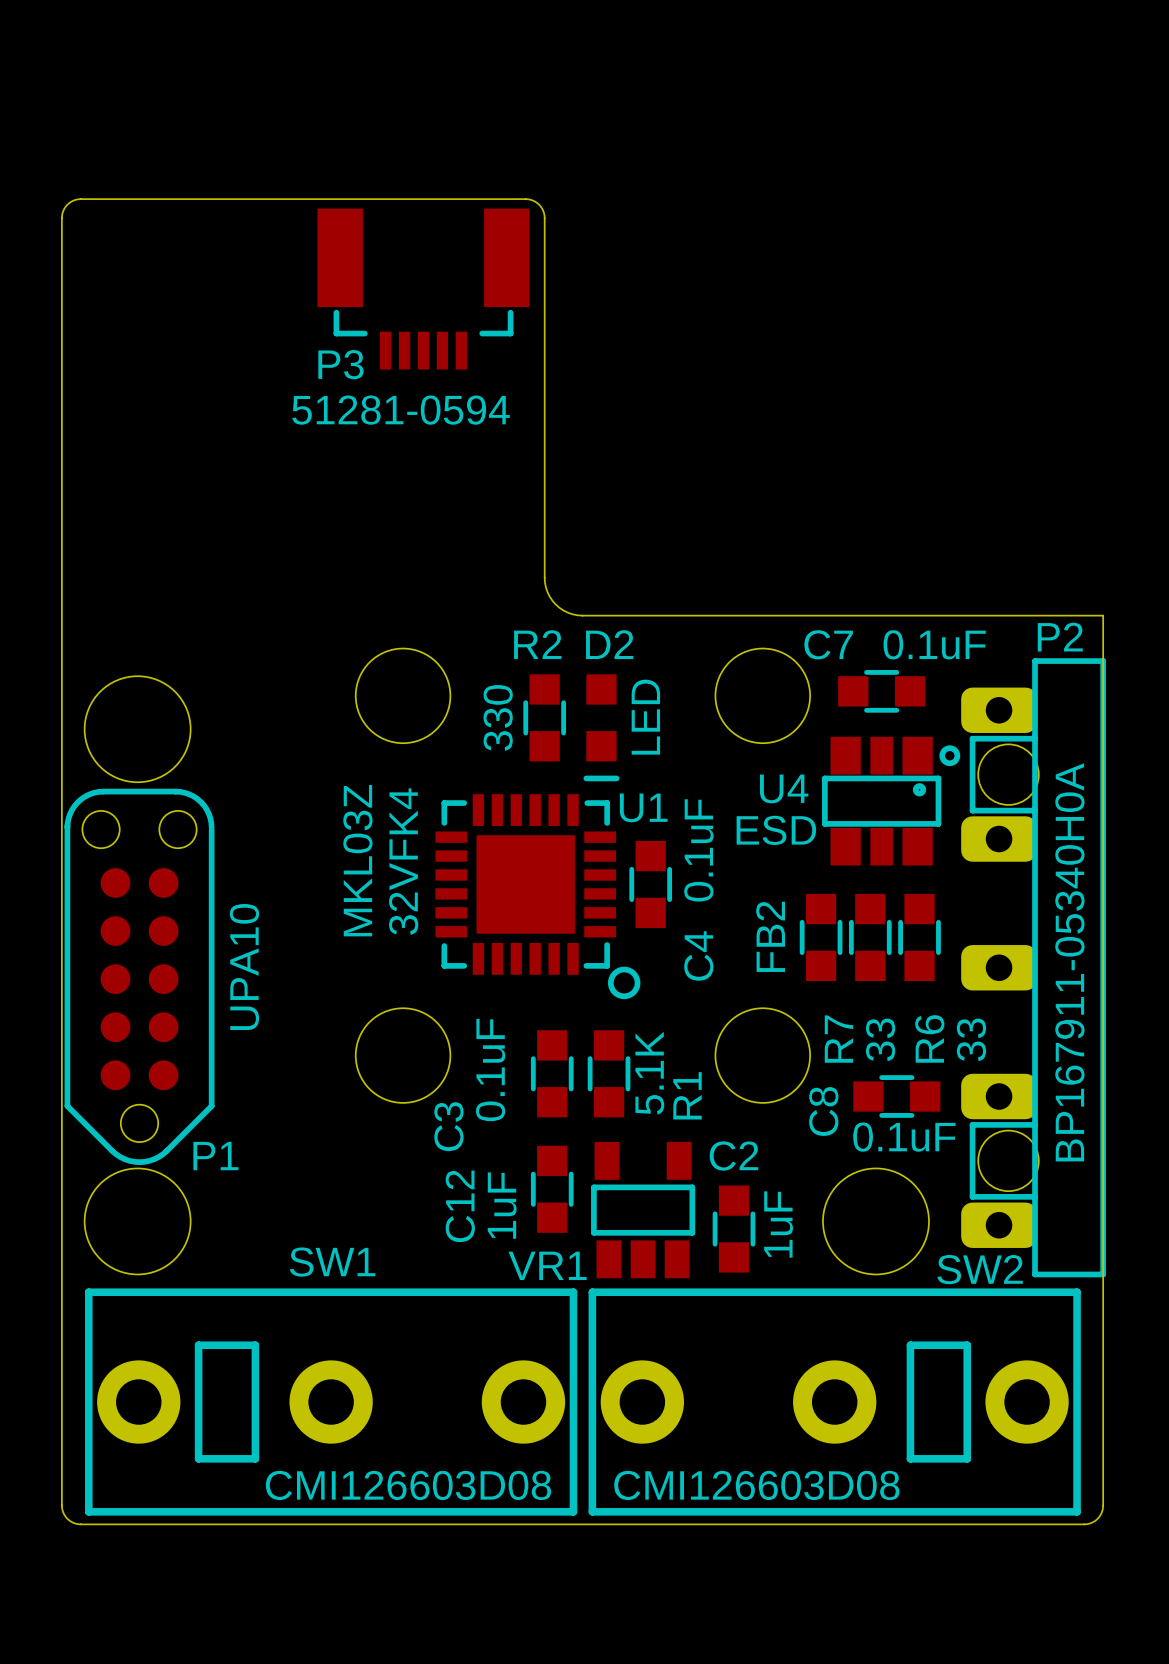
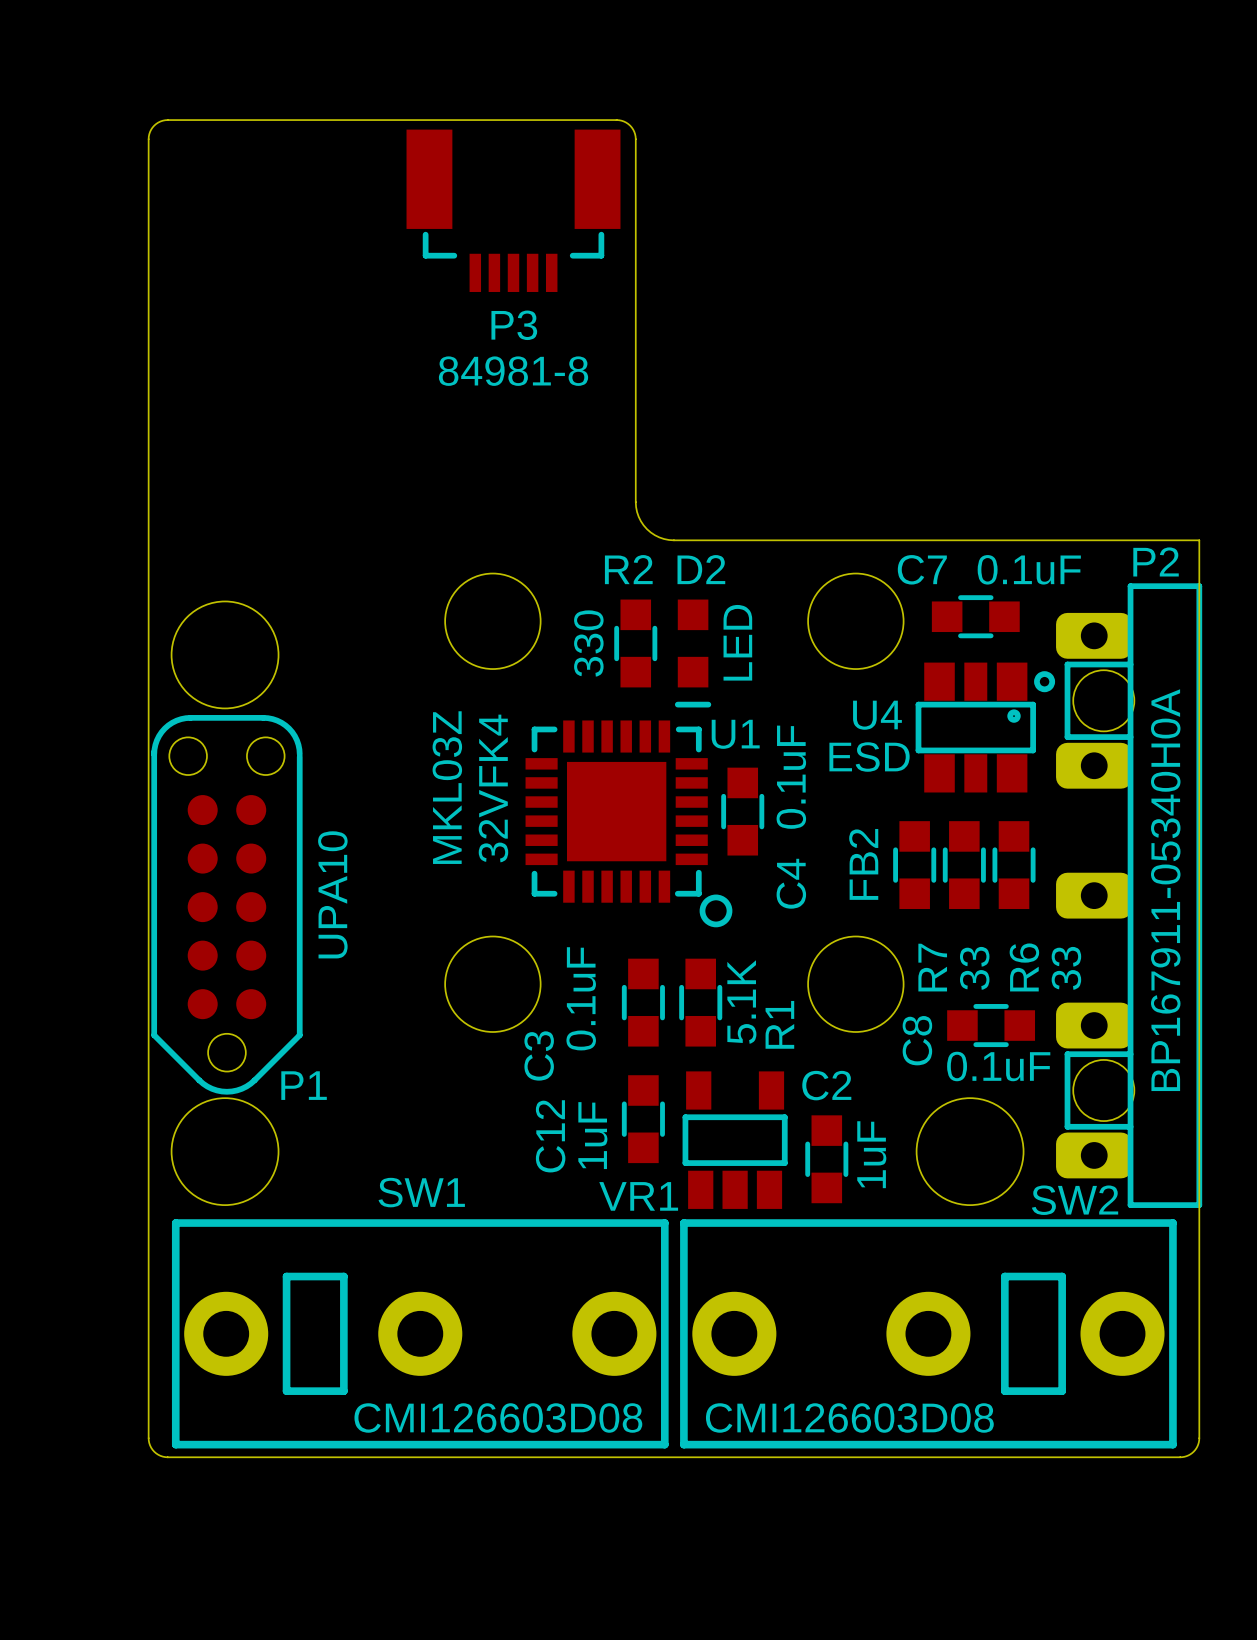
P3 name position: P3 (340, 364) -> P3 (514, 325)
text: 51281-0594 (401, 410) -> none
text: none -> 84981-8 (513, 371)

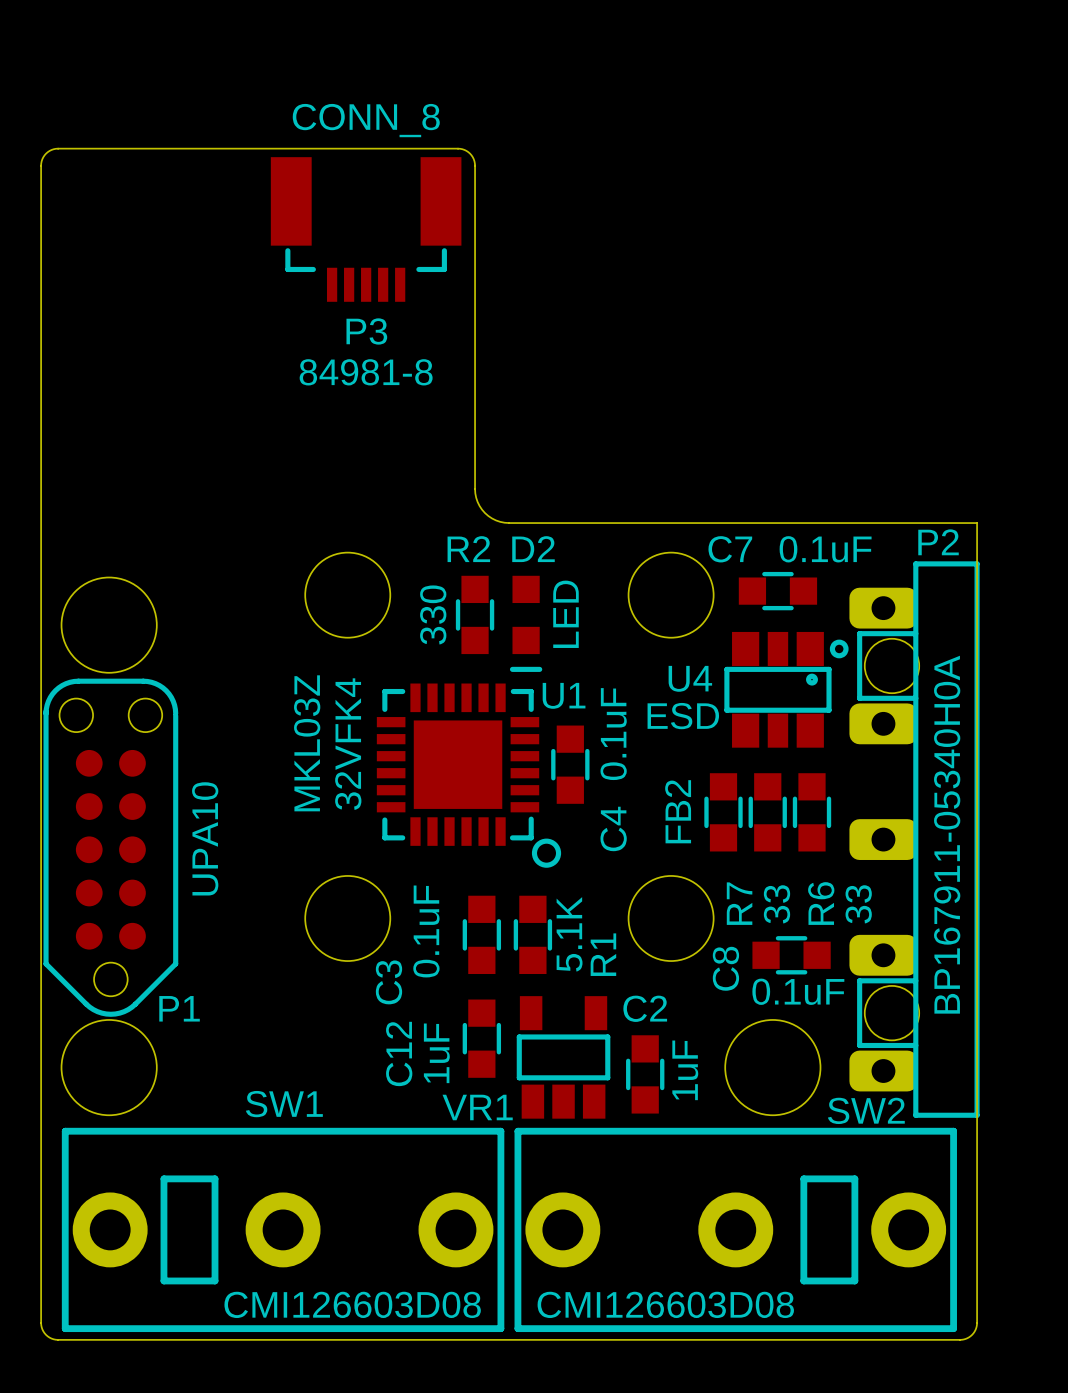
P3 value: none -> CONN_8 (366, 120)

